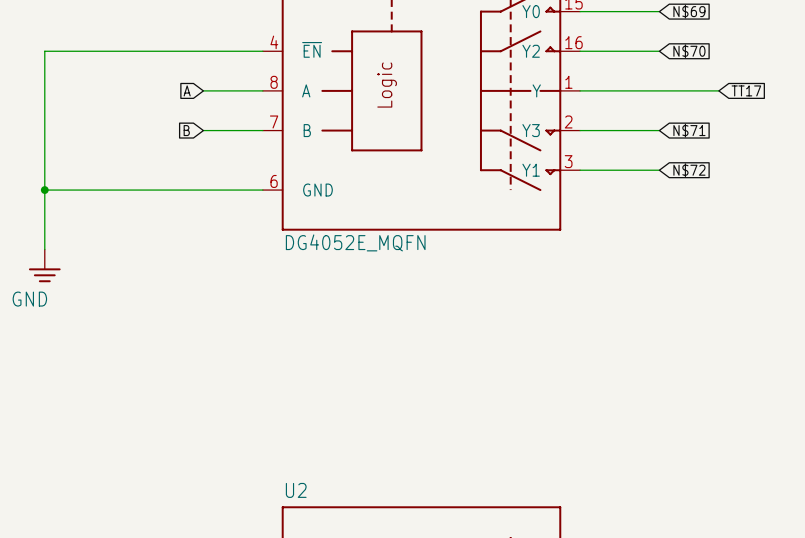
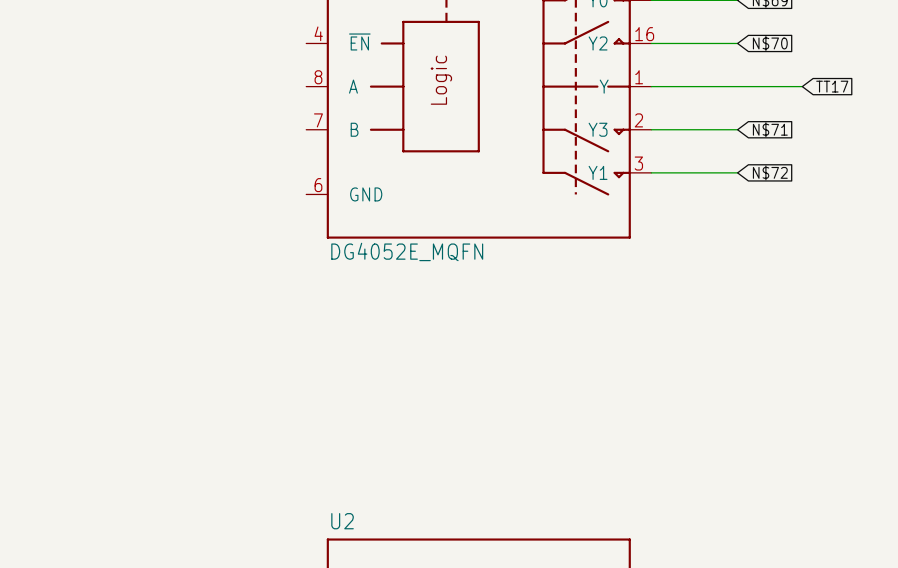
wire: (262, 51) (44, 51) (44, 249) -> none
global label: A (187, 90) -> none
wire: (203, 90) (262, 90) -> none
global label: B (186, 130) -> none
wire: (203, 130) (262, 130) -> none
wire: (44, 190) (262, 190) -> none
junction: (44, 190) -> none
power symbol: GND (44, 265) -> none

